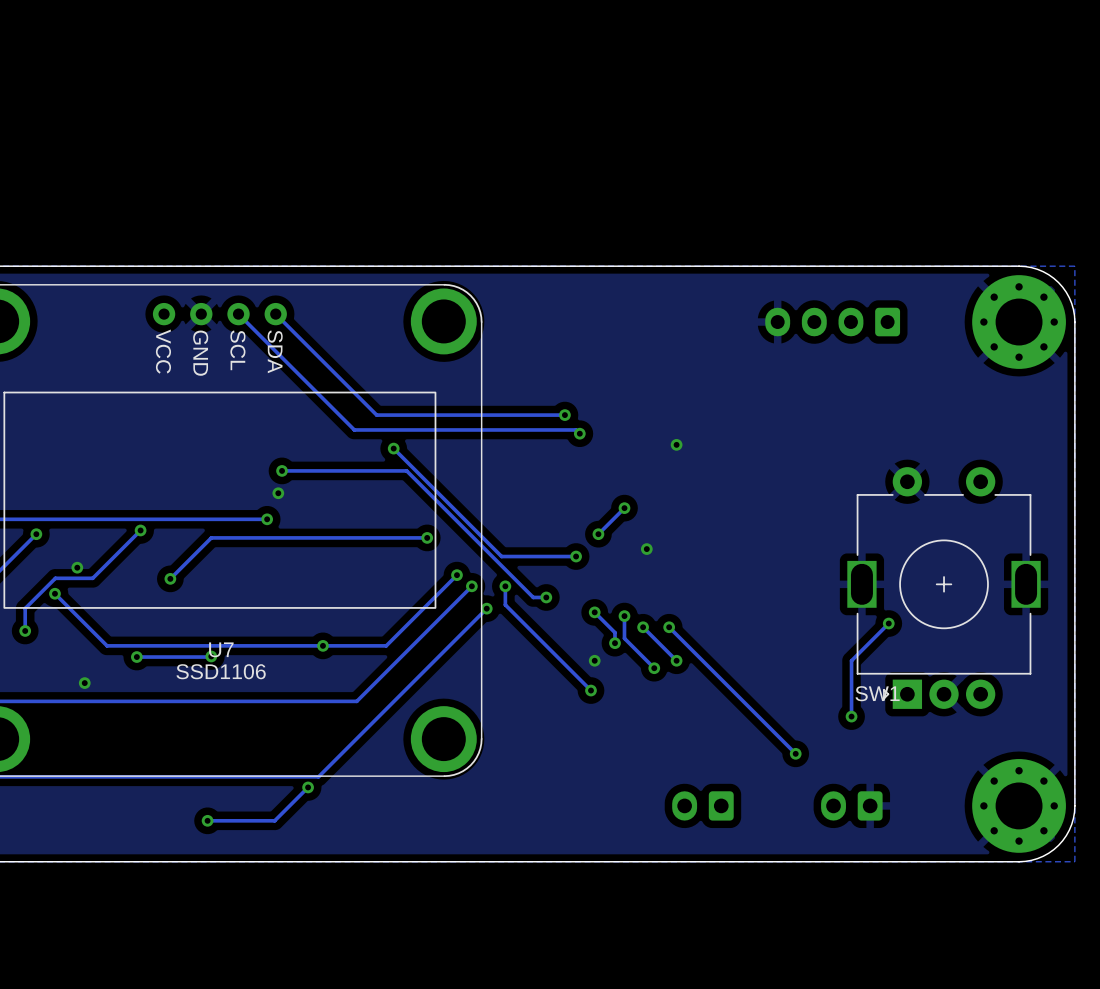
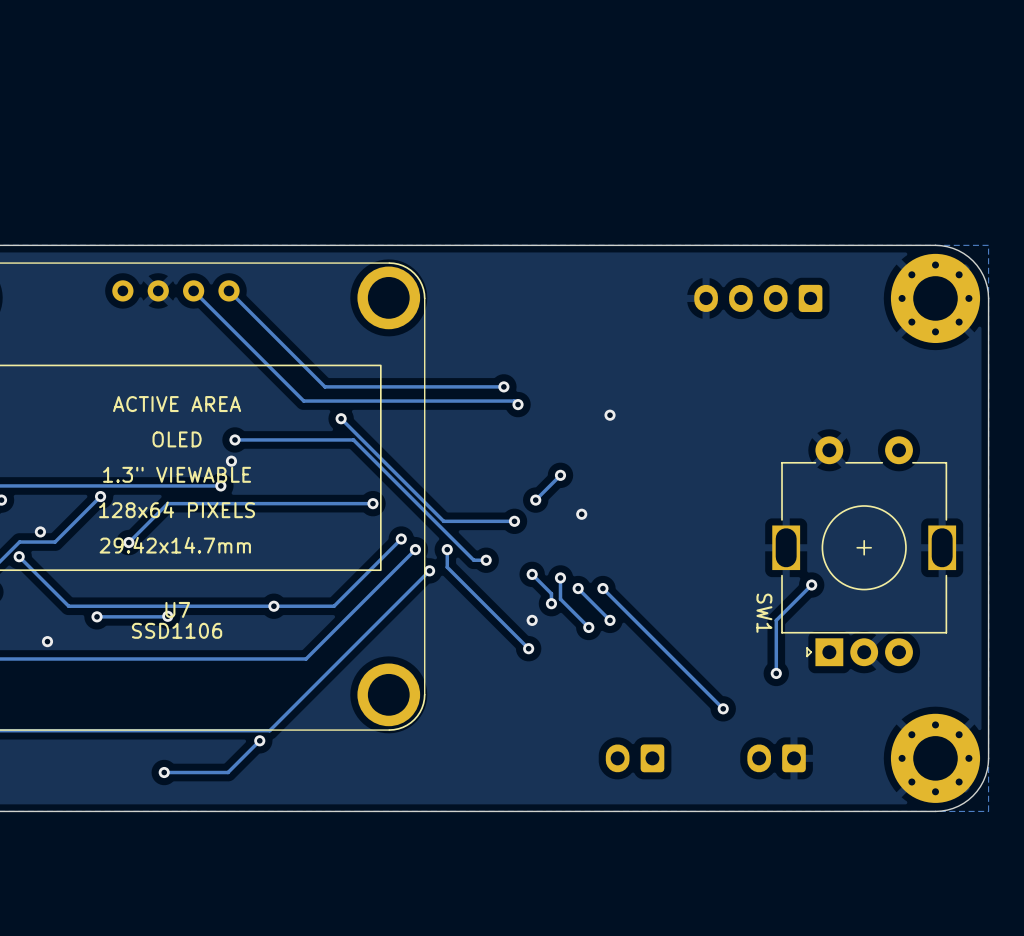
text: SCL (237, 350) -> none
text: VCC (163, 351) -> none
text: SDA (275, 351) -> none
text: GND (200, 353) -> none
U7 text: none -> ACTIVE AREA (177, 404)
U7 text: none -> OLED (177, 439)
U7 text: none -> 1.3" VIEWABLE (177, 474)
U7 text: none -> 128x64 PIXELS (177, 509)
U7 text: none -> 29.42x14.7mm (175, 545)
SW1 name rotation: 0° (877, 693) -> 90° clockwise (764, 613)
SW1 name position: SW1 (877, 693) -> SW1 (764, 613)

